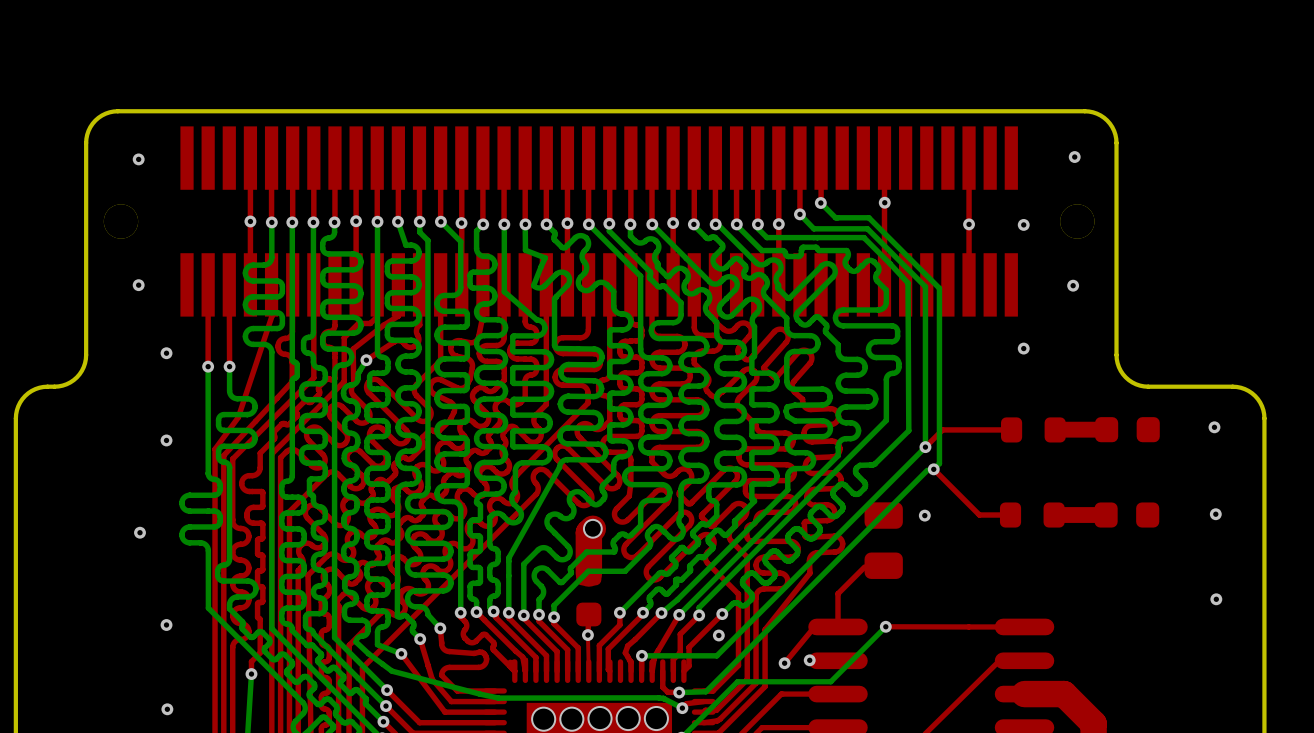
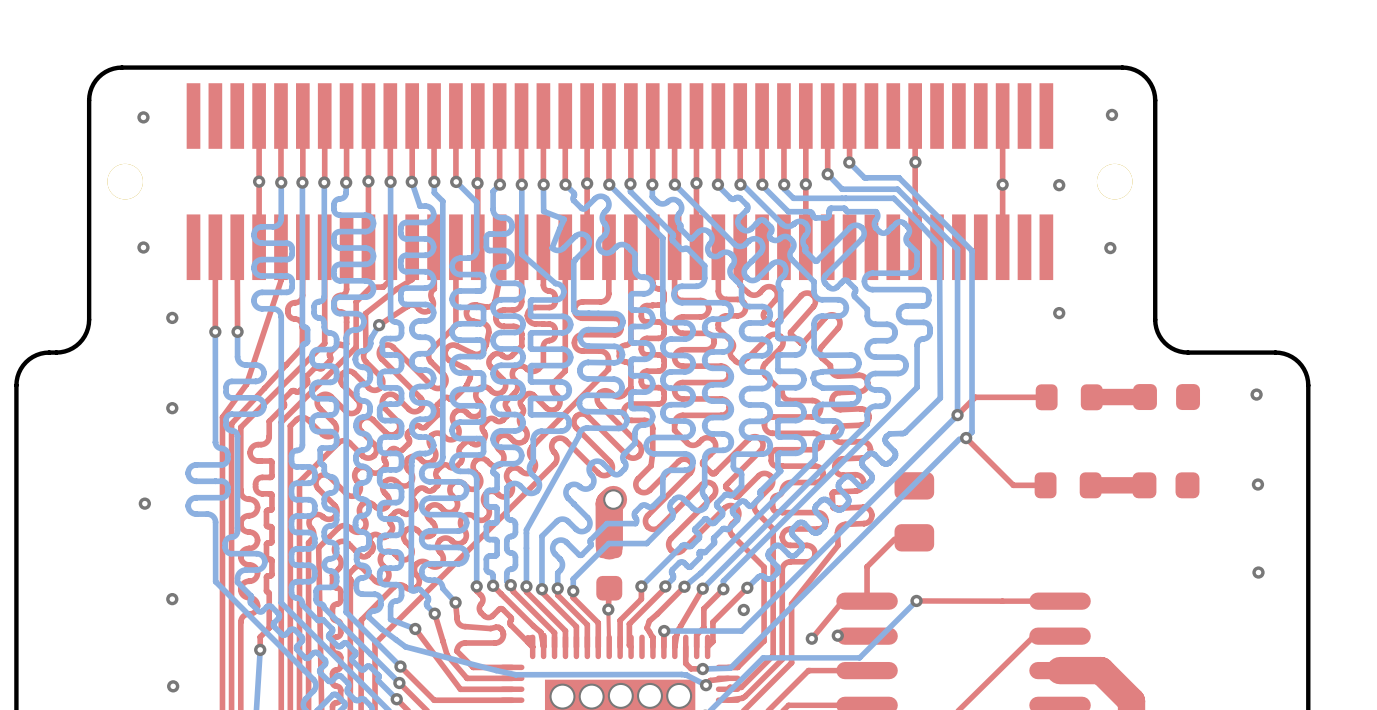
via: (924, 515) -> none

